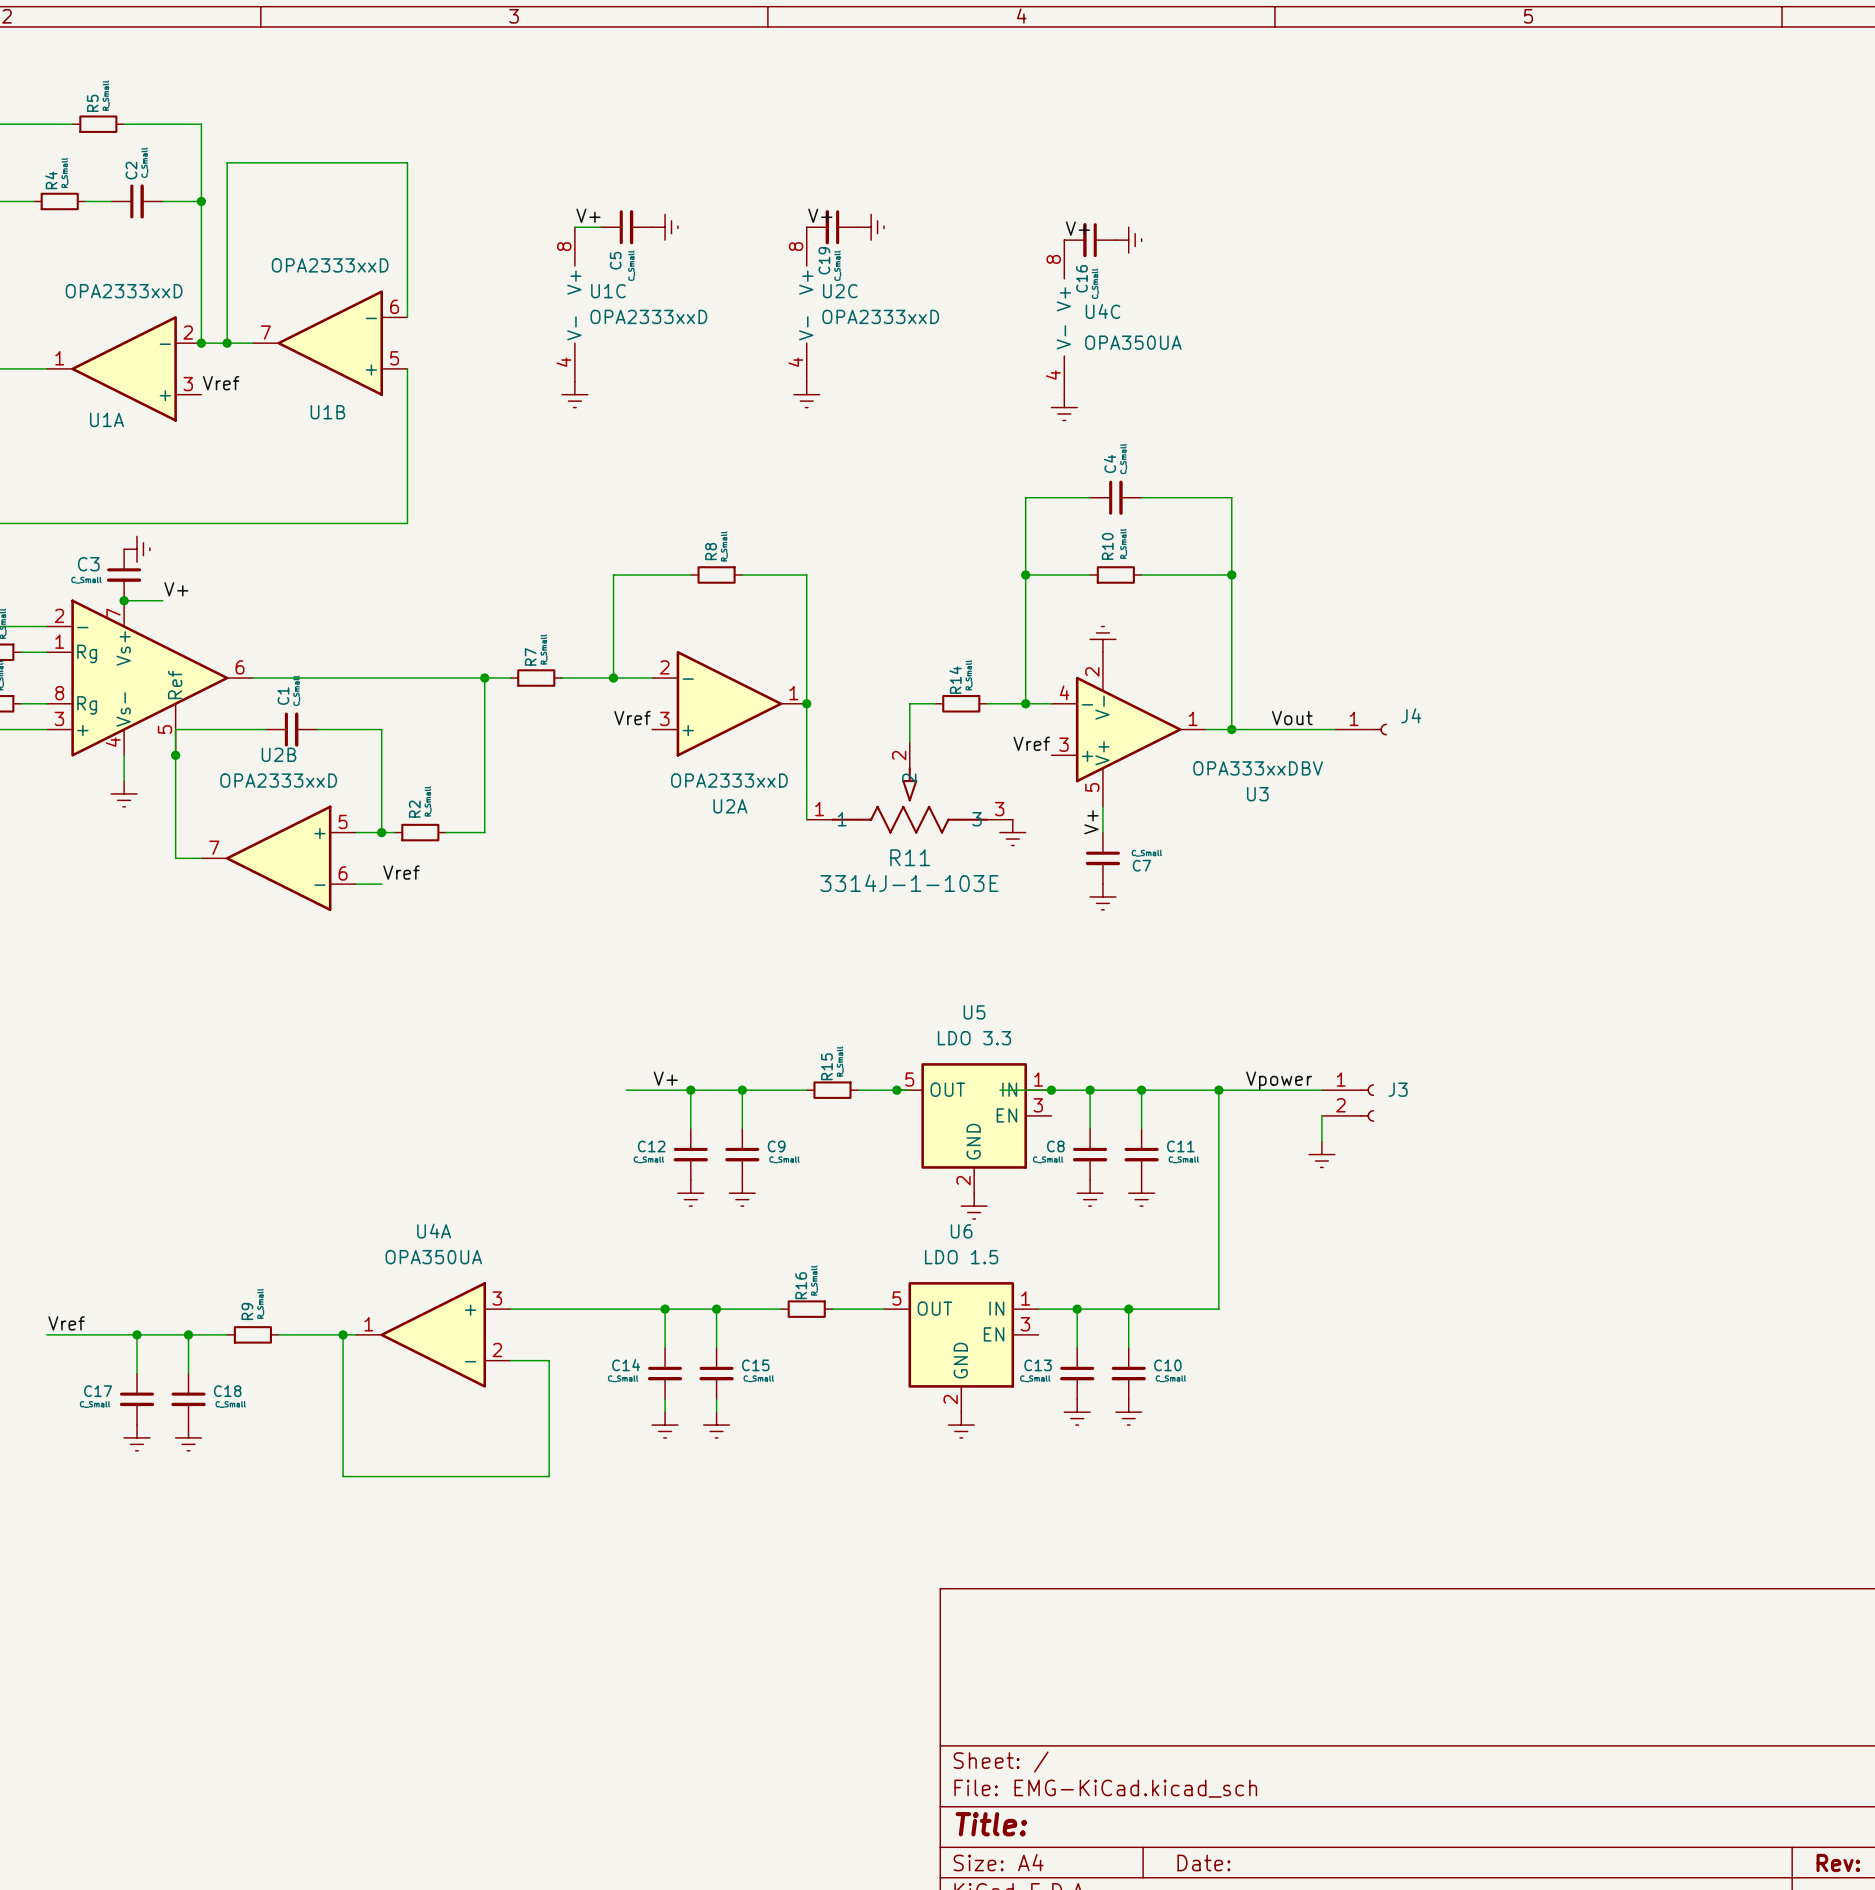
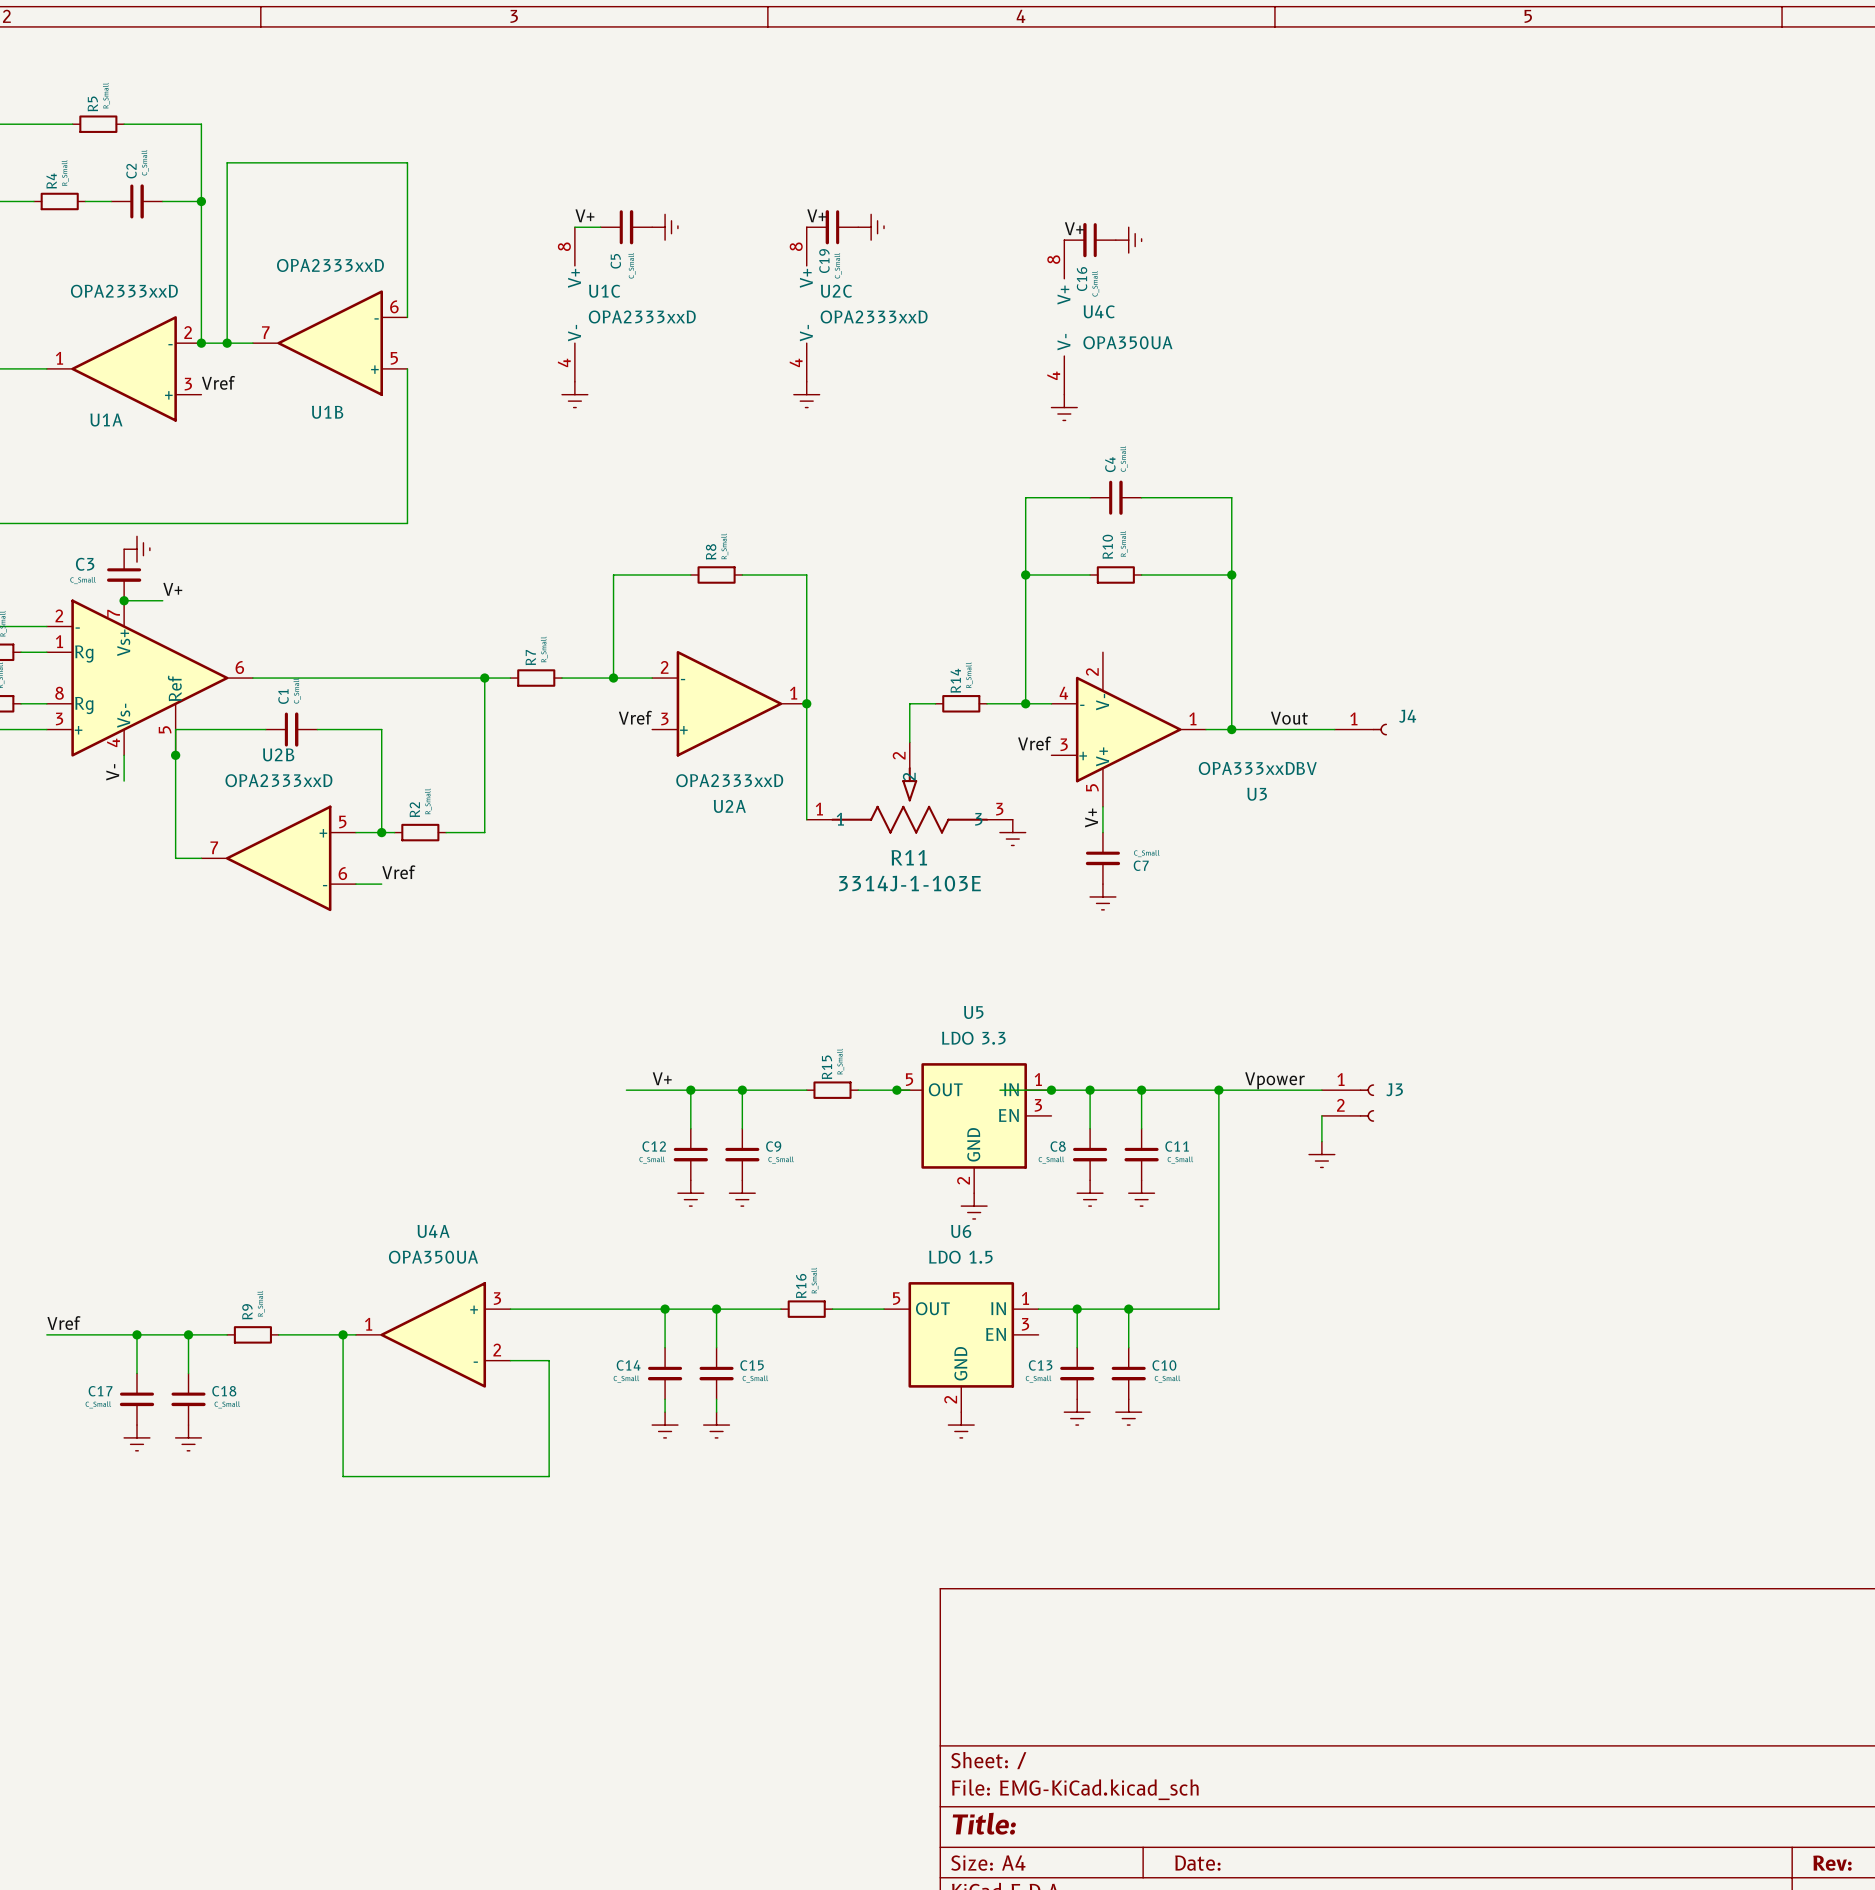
power symbol: (1102, 639) -> none
label: none -> V- (112, 772)
power symbol: (124, 793) -> none

